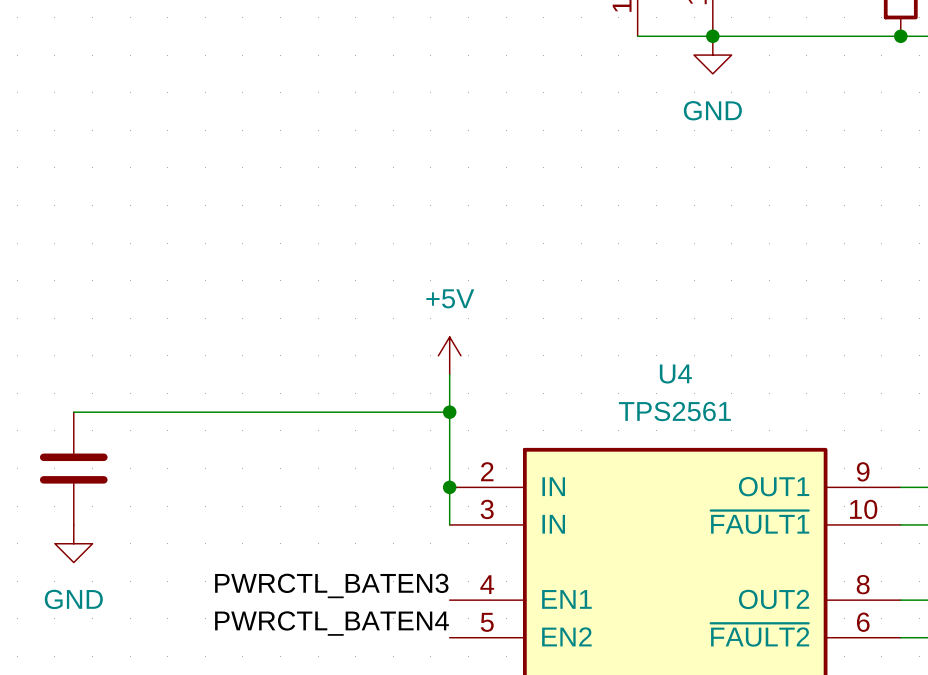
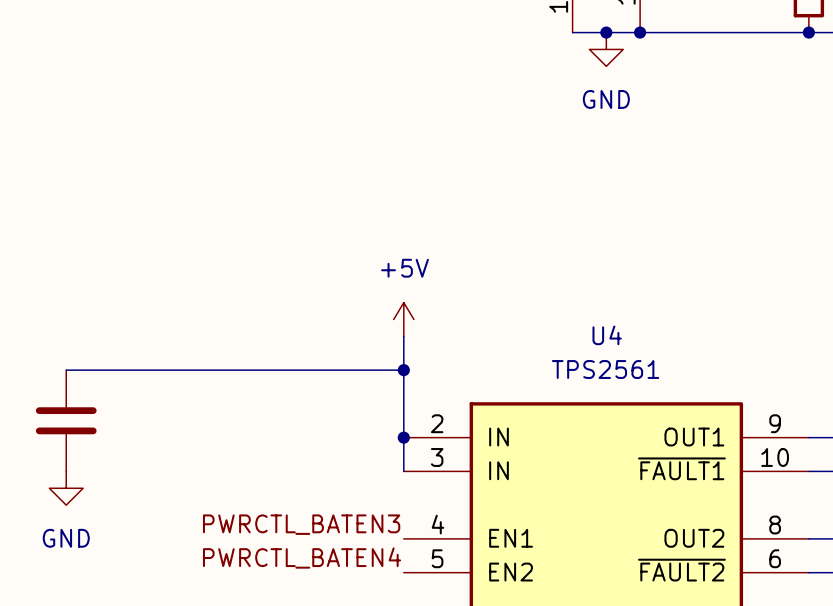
junction: none -> (606, 32)
power symbol position: GND (712, 55) -> GND (606, 49)

